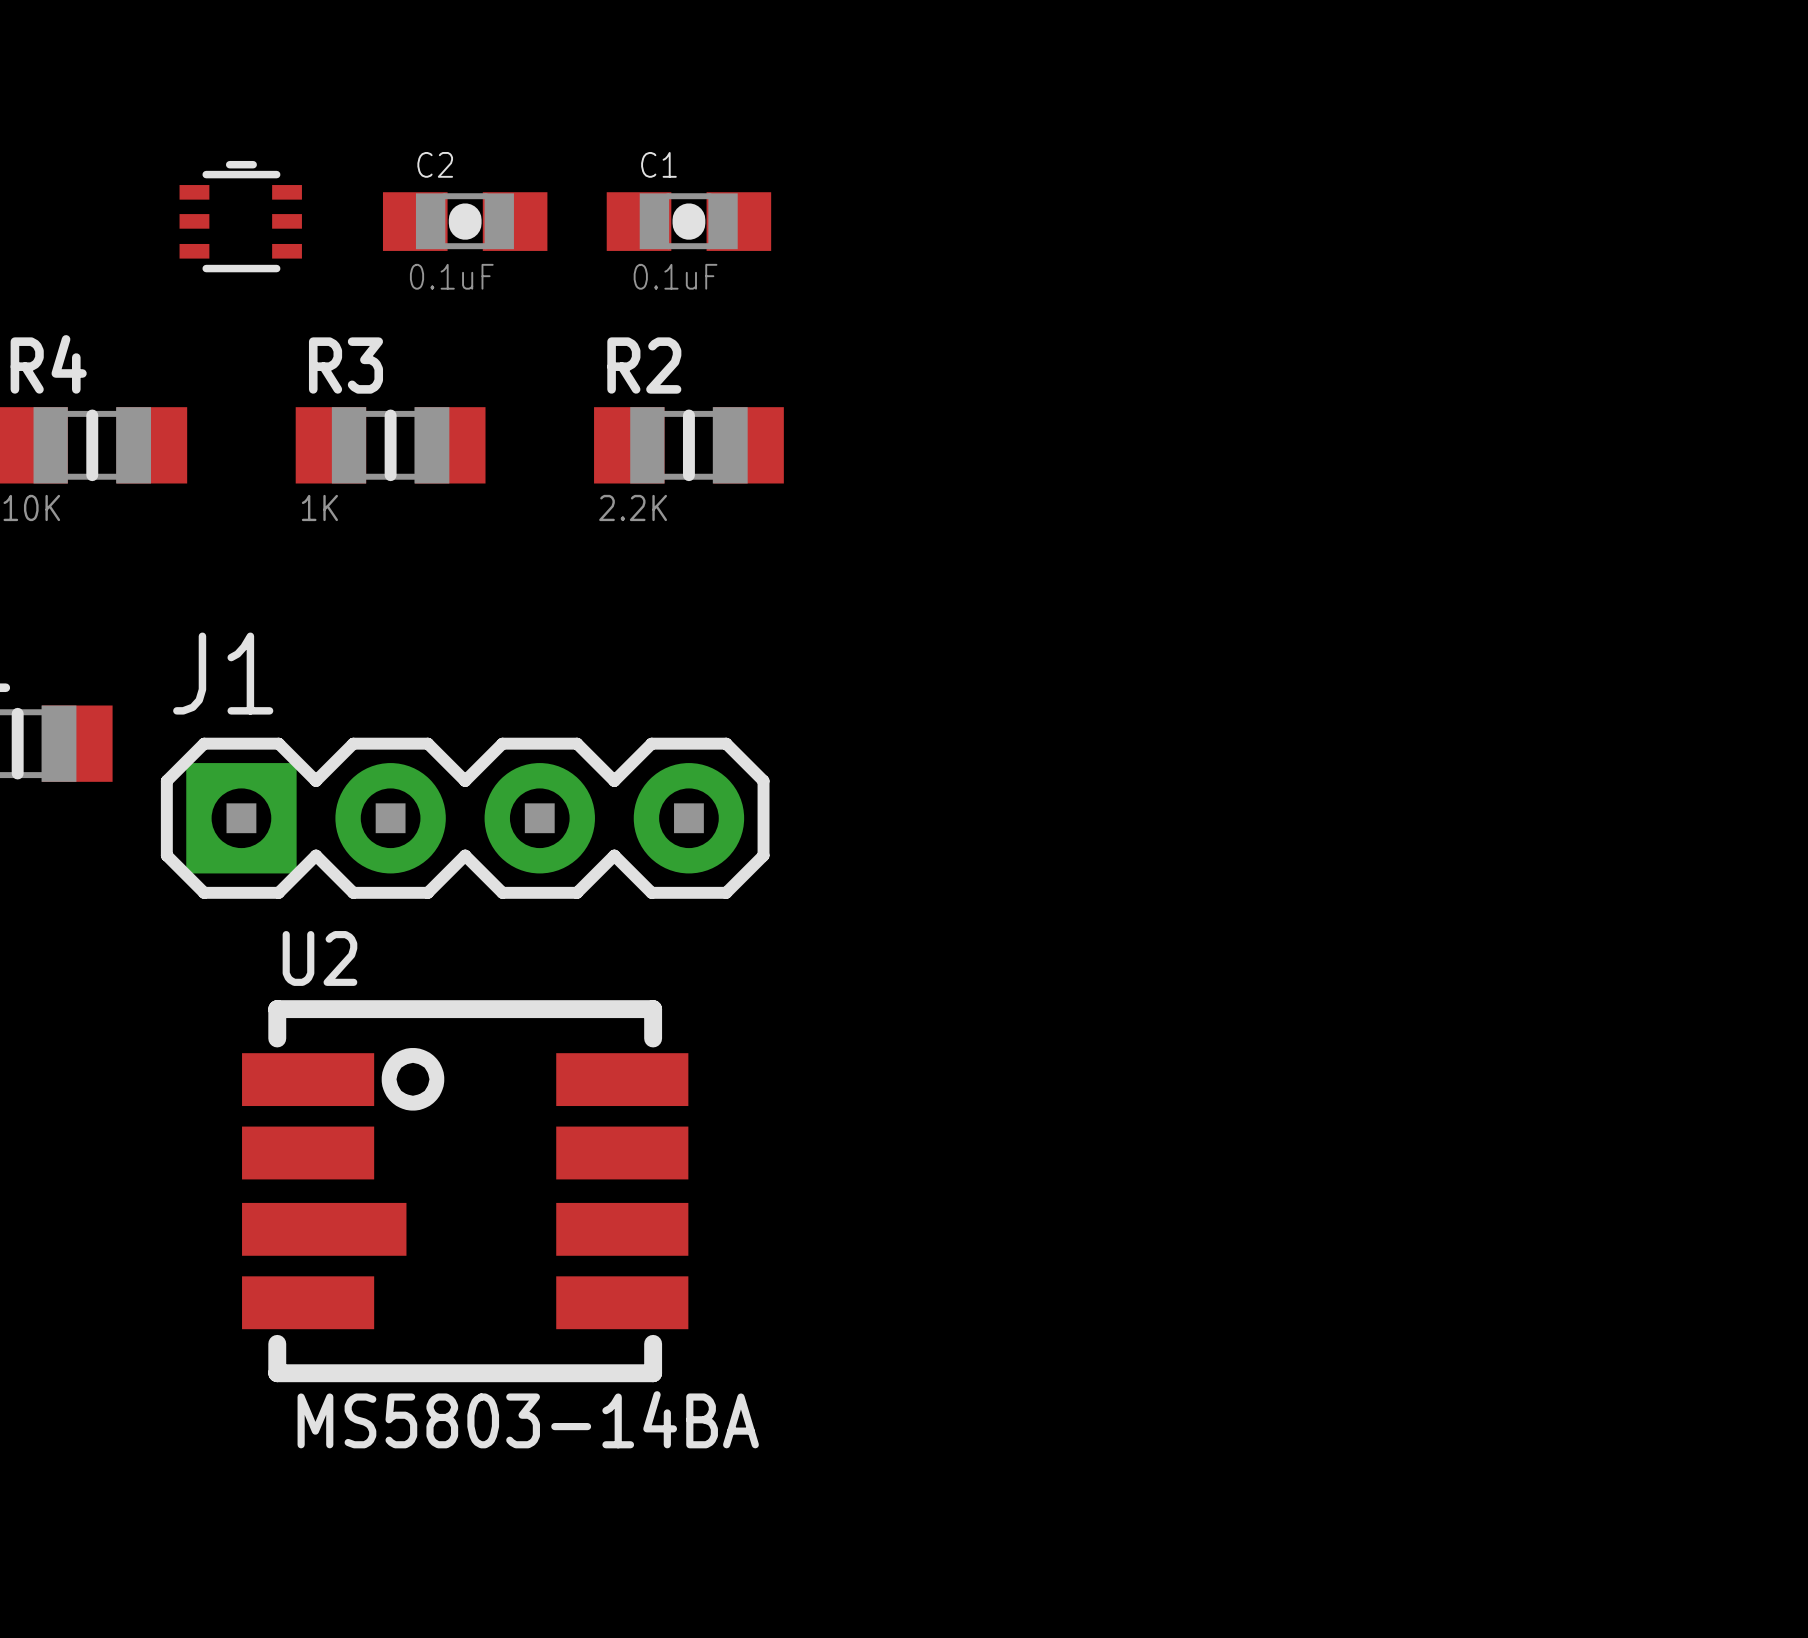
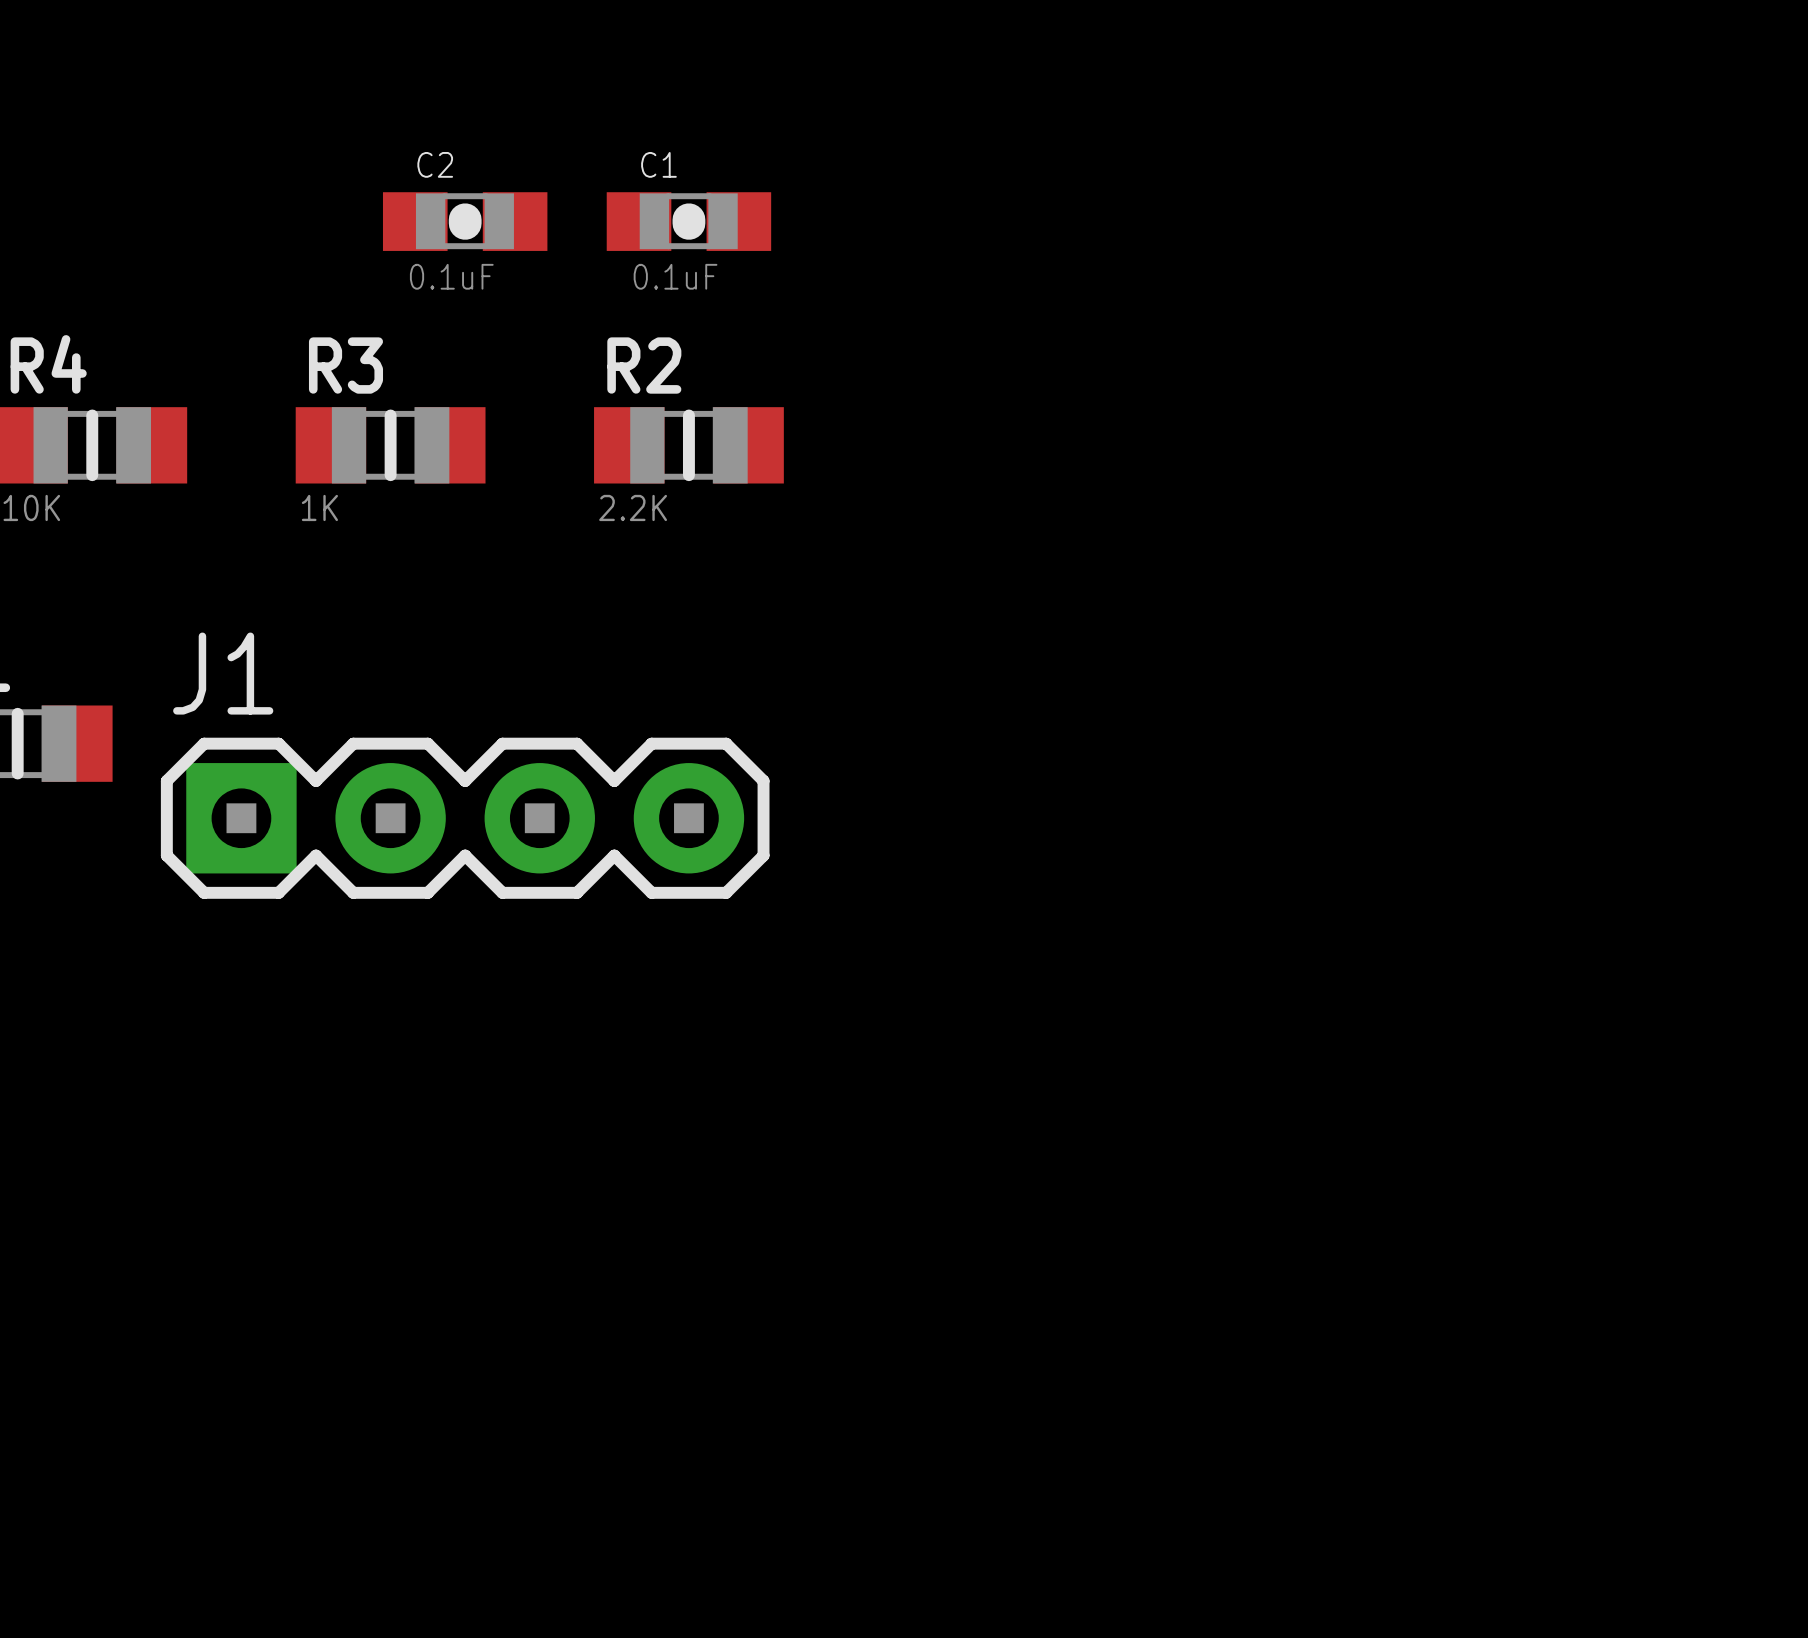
part: (240, 216) -> none
U2: MS5803-14BA (465, 1191) -> none

